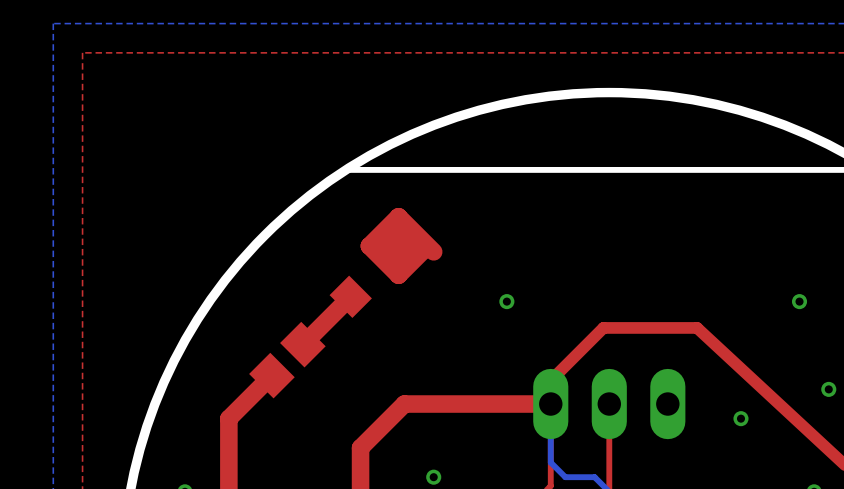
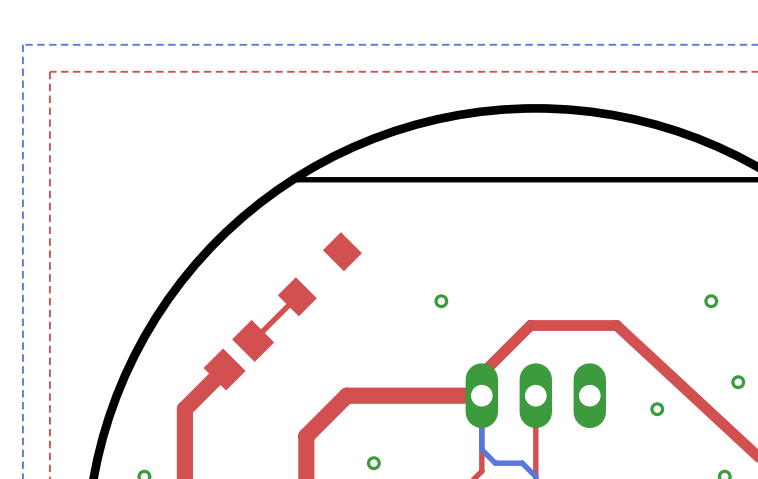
top track: (433, 251) (398, 216) (369, 246) (398, 275) (422, 251) -> none
top track width: thick (350, 296) (302, 344) -> thin (297, 296) (253, 340)

